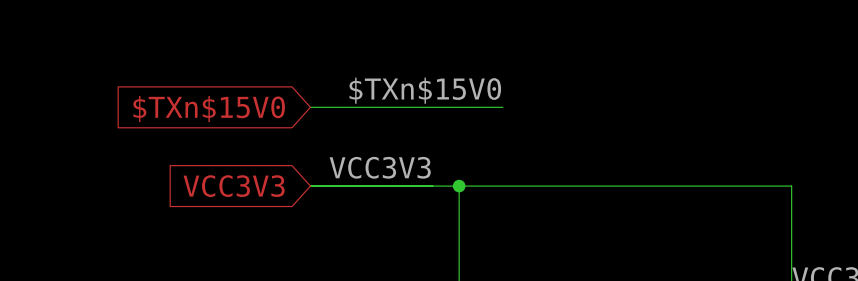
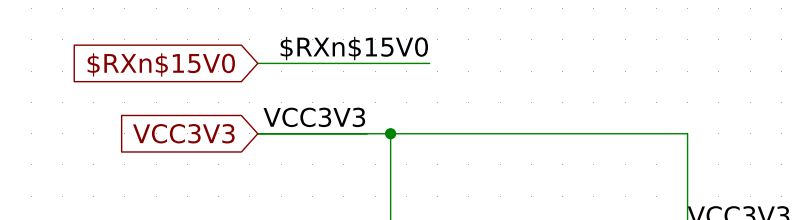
label: $TXn$15V0 (425, 90) -> $RXn$15V0 (354, 48)
global label: $TXn$15V0 (209, 109) -> $RXn$15V0 (161, 64)

